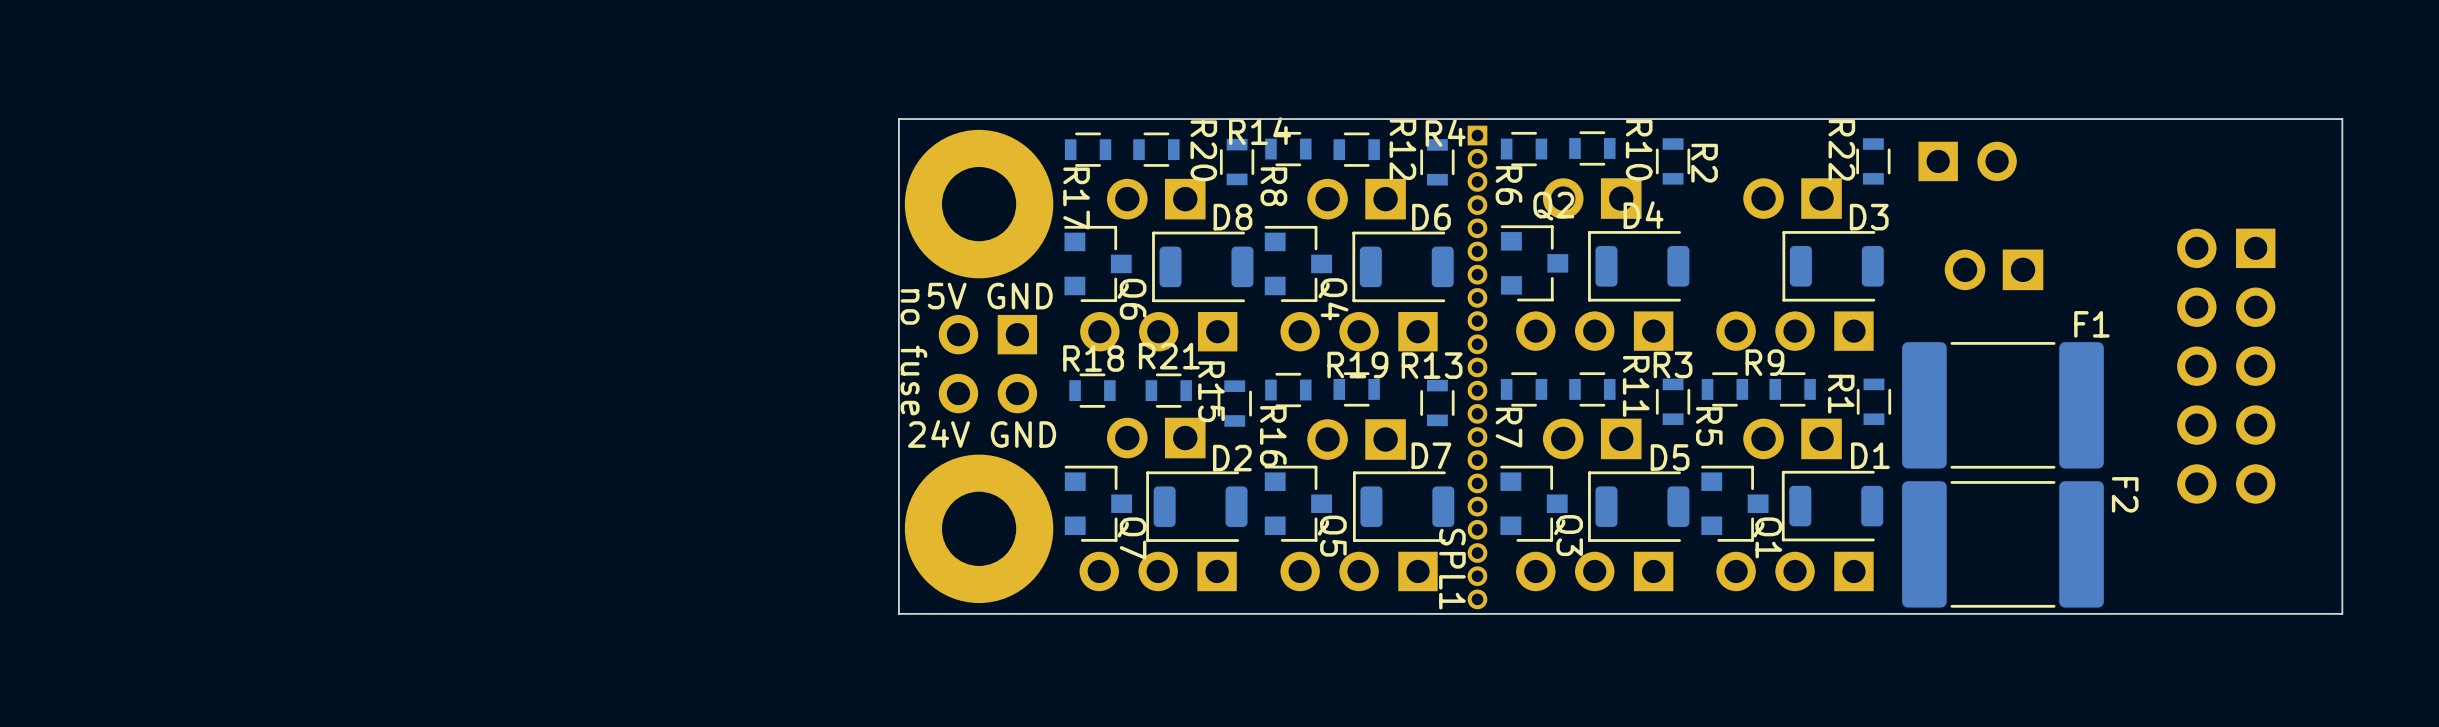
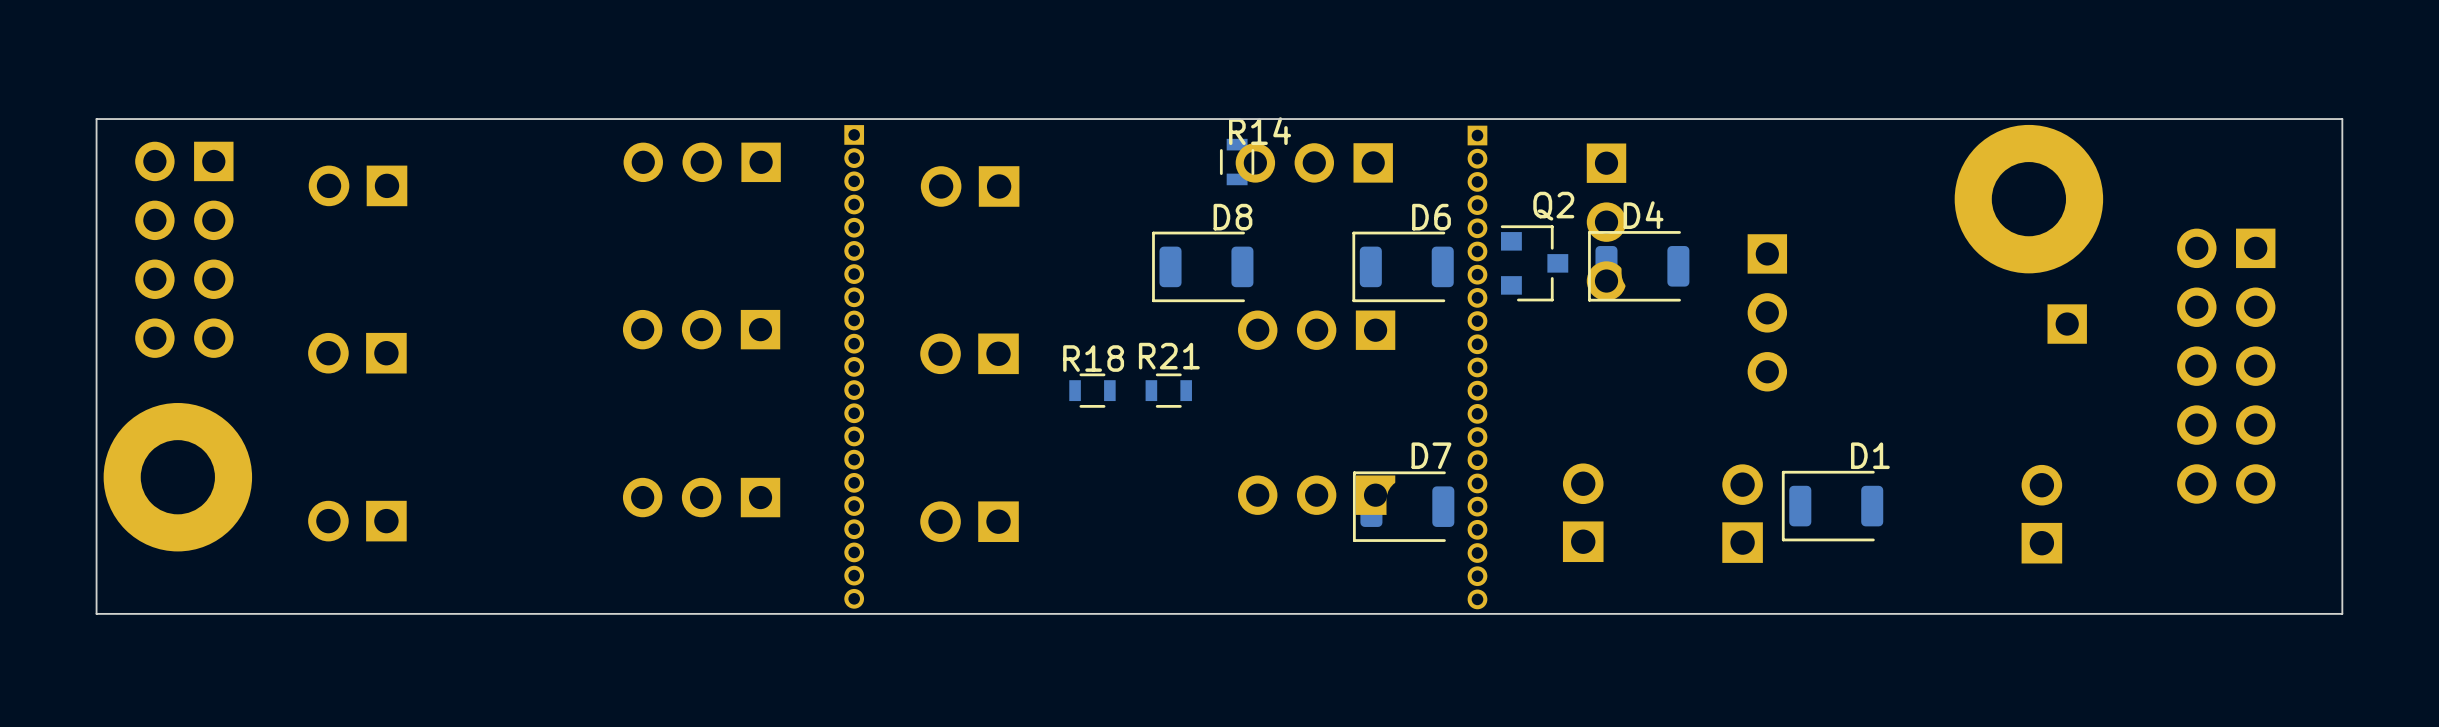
board edge: (898, 119) (898, 613) -> (898, 119) (96, 119) (96, 613) (898, 613)
part footprint: [904, 129, 1054, 279] -> [920, 166, 1020, 207]
R10: (1592, 148) -> none
R17: (1088, 149) -> none
R20: (1156, 149) -> none
R8: (1288, 149) -> none
R12: (1356, 149) -> none
R6: (1524, 149) -> none
R2: (1673, 161) -> none
R22: (1873, 161) -> none
part: (1967, 161) -> none
part: none -> (702, 162)
part: none -> (1314, 162)
R4: (1437, 162) -> none
part: none -> (358, 185)
part: (1592, 198) -> none
part: (1792, 198) -> none
part: (1156, 199) -> none
part: (1356, 199) -> none
part: none -> (2028, 199)
part: none -> (1606, 222)
part: none -> (184, 249)
Q6: (1097, 263) -> none
Q4: (1298, 263) -> none
D3: (1833, 266) -> none
part: (1994, 269) -> none
text: 5V GND (990, 296) -> none
part footprint: [938, 314, 1038, 414] -> [920, 333, 1019, 375]
part: none -> (2067, 324)
part: none -> (701, 329)
part: (1158, 331) -> none
part position: (1359, 331) -> (1316, 330)
part: (1594, 331) -> none
part rotation: 0° (1795, 331) -> 90° counterclockwise (1767, 312)
text: no fuse (913, 352) -> none
part: none -> (357, 353)
part: none -> (854, 366)
R19: (1356, 389) -> none
R7: (1524, 389) -> none
R11: (1592, 389) -> none
R5: (1724, 389) -> none
R9: (1792, 389) -> none
R16: (1288, 390) -> none
R3: (1673, 401) -> none
R1: (1873, 401) -> none
R13: (1437, 402) -> none
R15: (1234, 403) -> none
F1: (2002, 405) -> none
text: 24V GND (982, 433) -> none
part: (1156, 438) -> none
part rotation: 0° (1592, 438) -> 90° clockwise (1583, 512)
part position: (1592, 438) -> (1583, 512)
part: (1792, 438) -> none
part: (1356, 439) -> none
part footprint: [904, 454, 1054, 604] -> [920, 501, 1019, 542]
part: none -> (177, 477)
part: none -> (1316, 495)
part: none -> (701, 497)
Q7: (1098, 503) -> none
Q5: (1298, 503) -> none
Q3: (1533, 503) -> none
Q1: (1734, 503) -> none
D2: (1196, 506) -> none
D5: (1638, 506) -> none
part: none -> (1742, 513)
part: none -> (2041, 514)
part: none -> (357, 521)
F2: (2002, 544) -> none
SPL1 name: SPL1 (1452, 569) -> none
part: (1158, 571) -> none
part: (1359, 571) -> none
part: (1594, 571) -> none
part: (1795, 571) -> none

